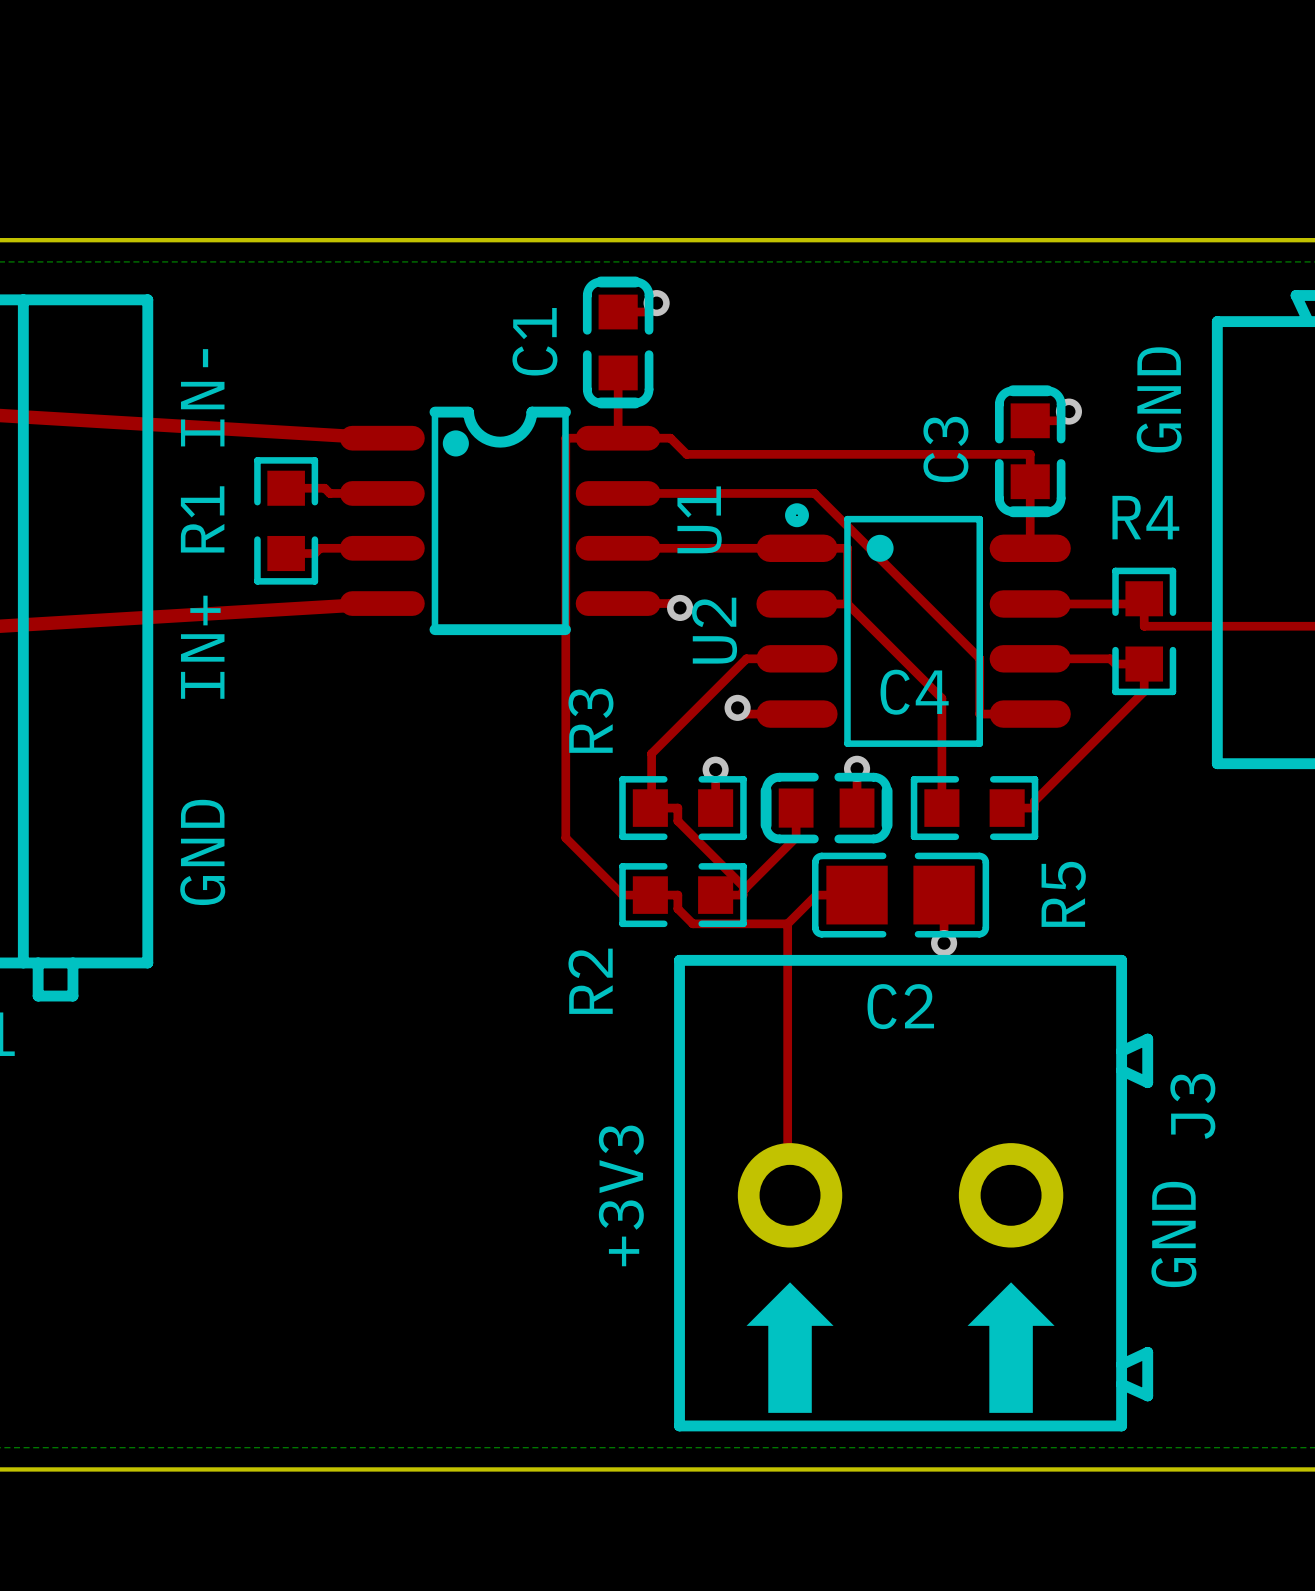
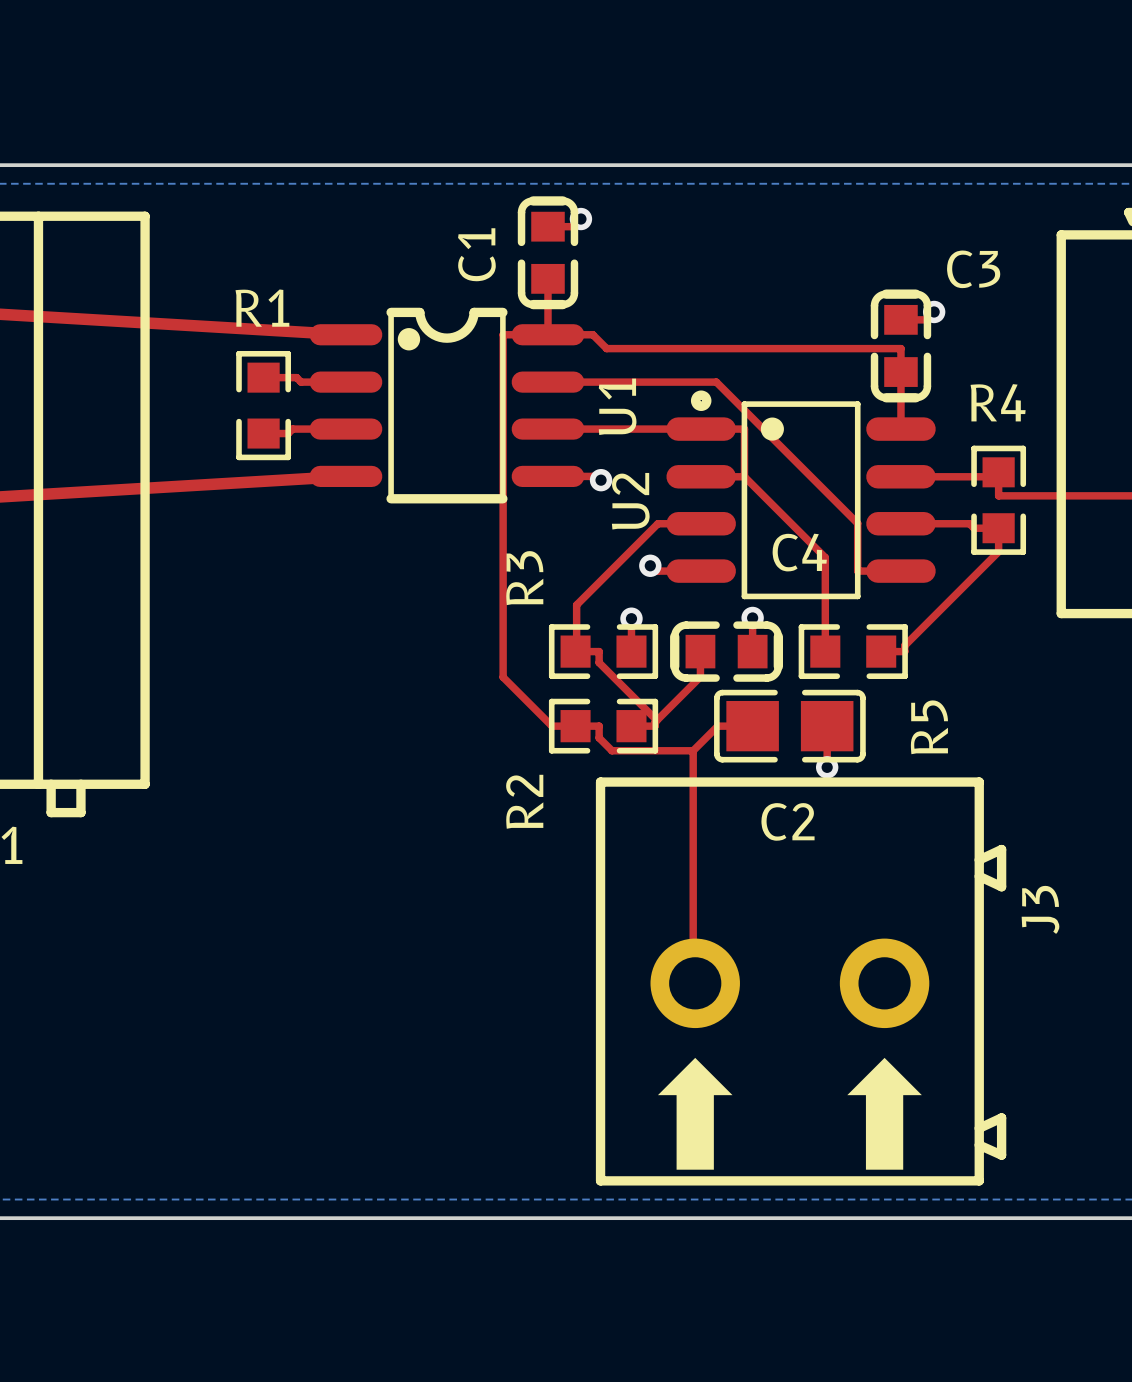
text: IN- (202, 397) -> none
text: GND (1159, 399) -> none
C3 name rotation: 0° (945, 449) -> 90° clockwise (973, 269)
C3 name position: C3 (945, 449) -> C3 (973, 269)
R1 name rotation: 0° (202, 519) -> 90° clockwise (262, 308)
R1 name position: R1 (202, 519) -> R1 (262, 308)
text: IN+ (202, 647) -> none
text: GND (202, 852) -> none
text: +3V3 (621, 1195) -> none
text: GND (1173, 1234) -> none

